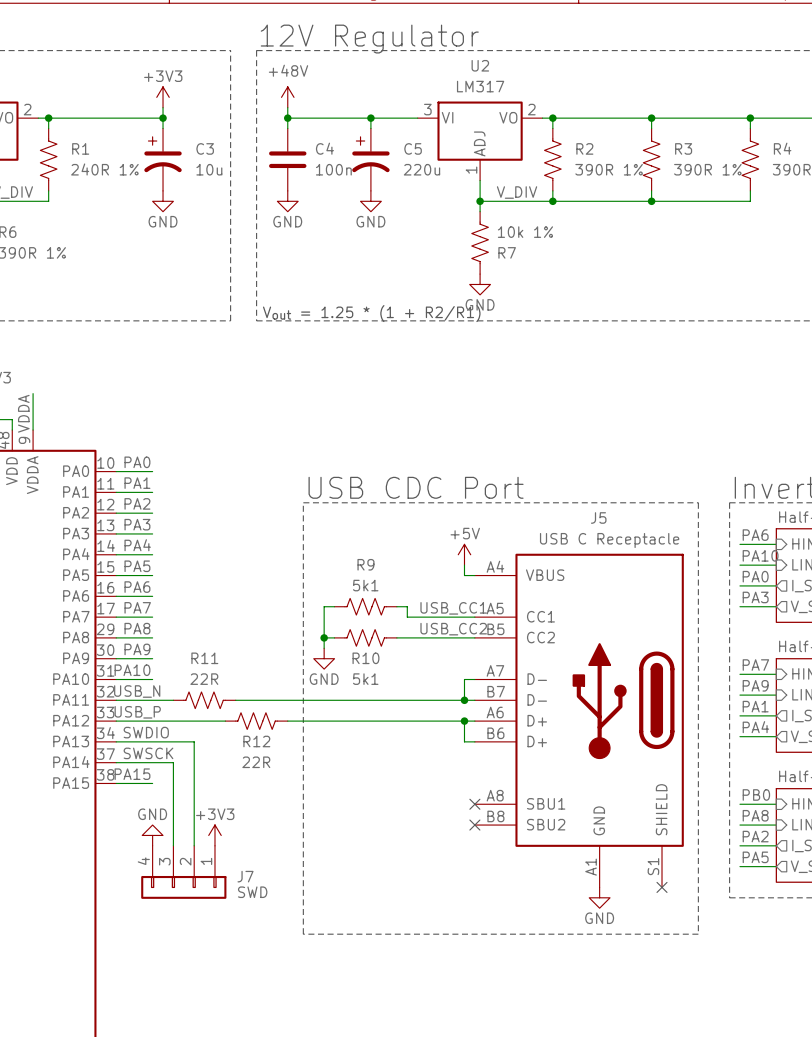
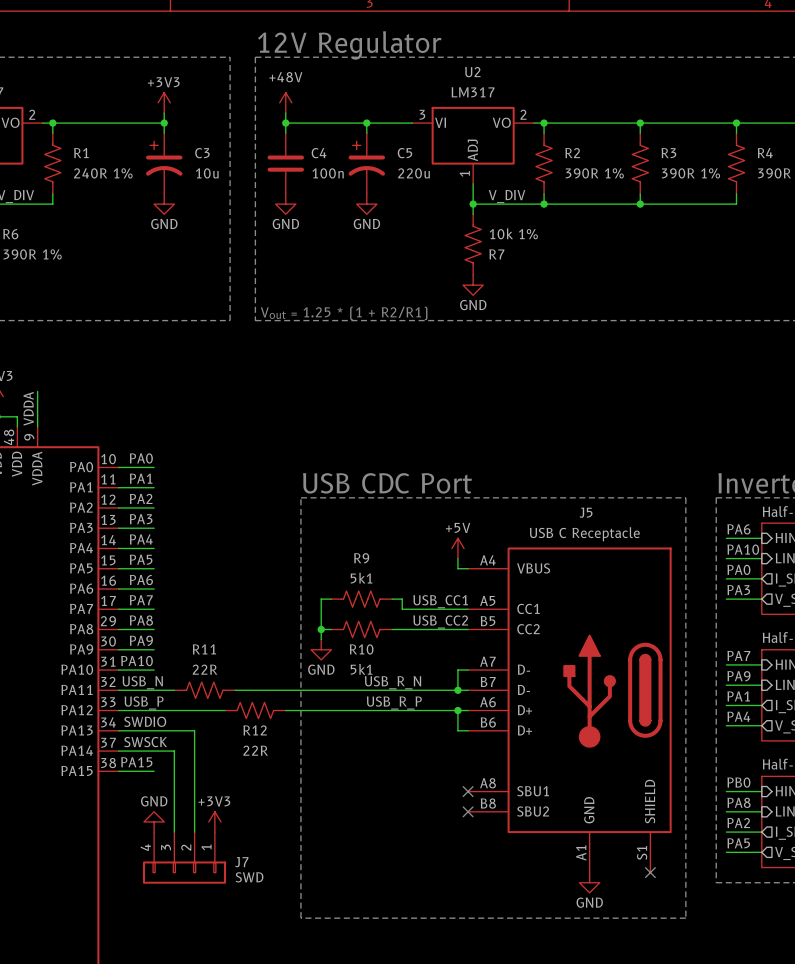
label: none -> USB_R_N (393, 682)
label: none -> USB_R_P (394, 703)

